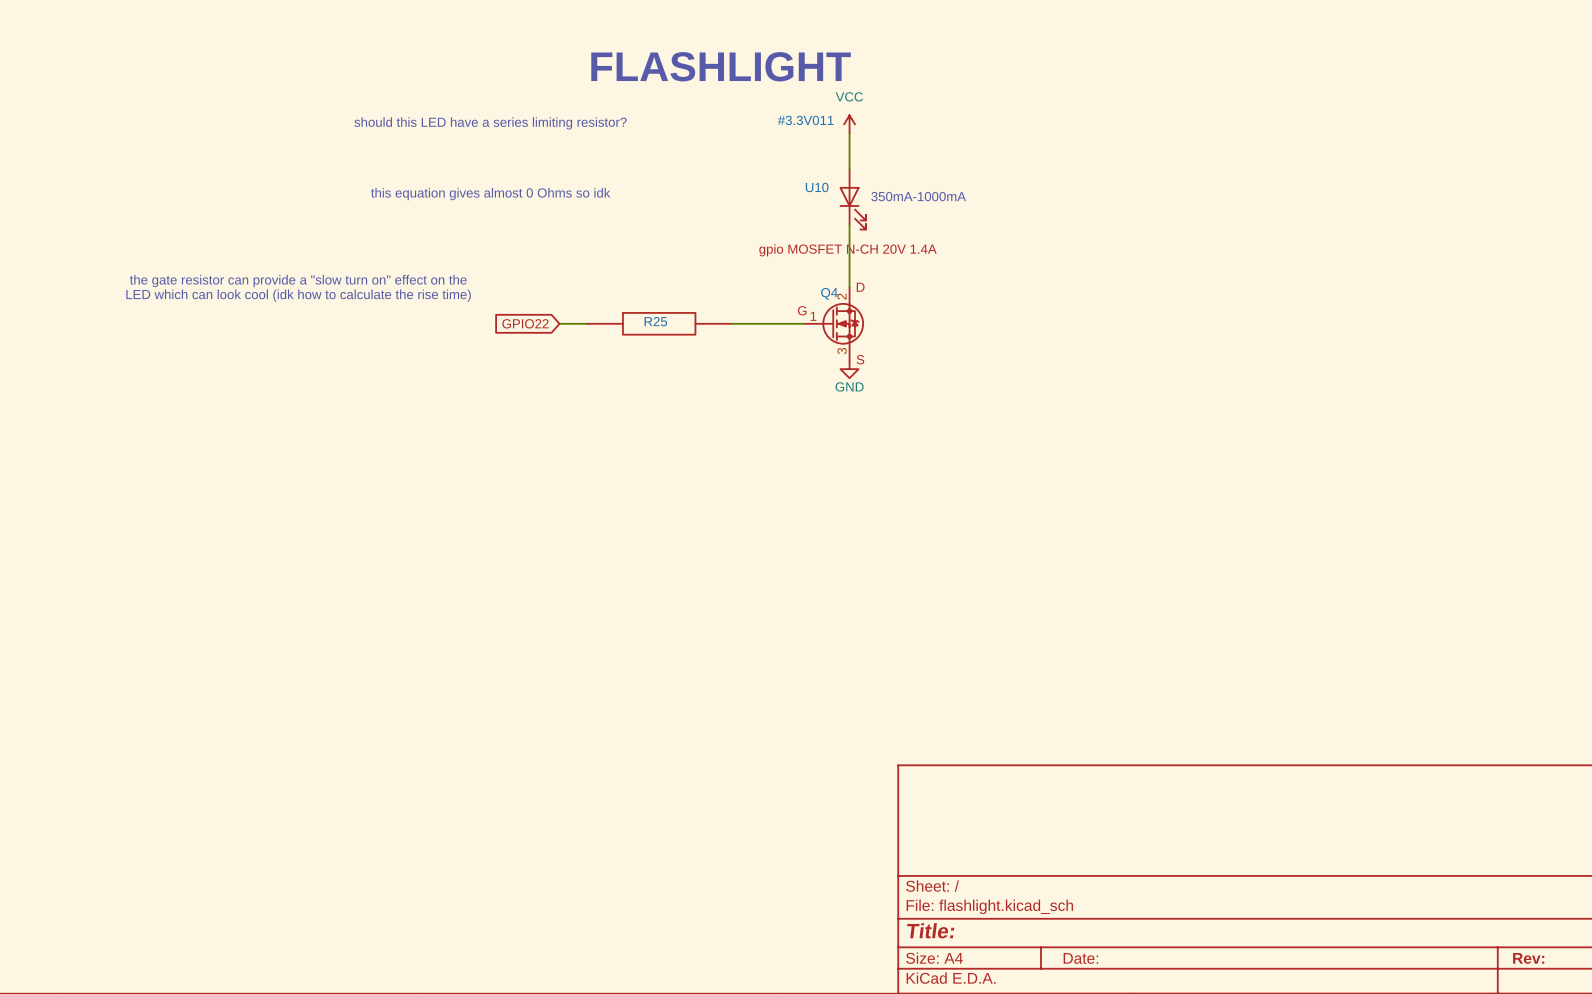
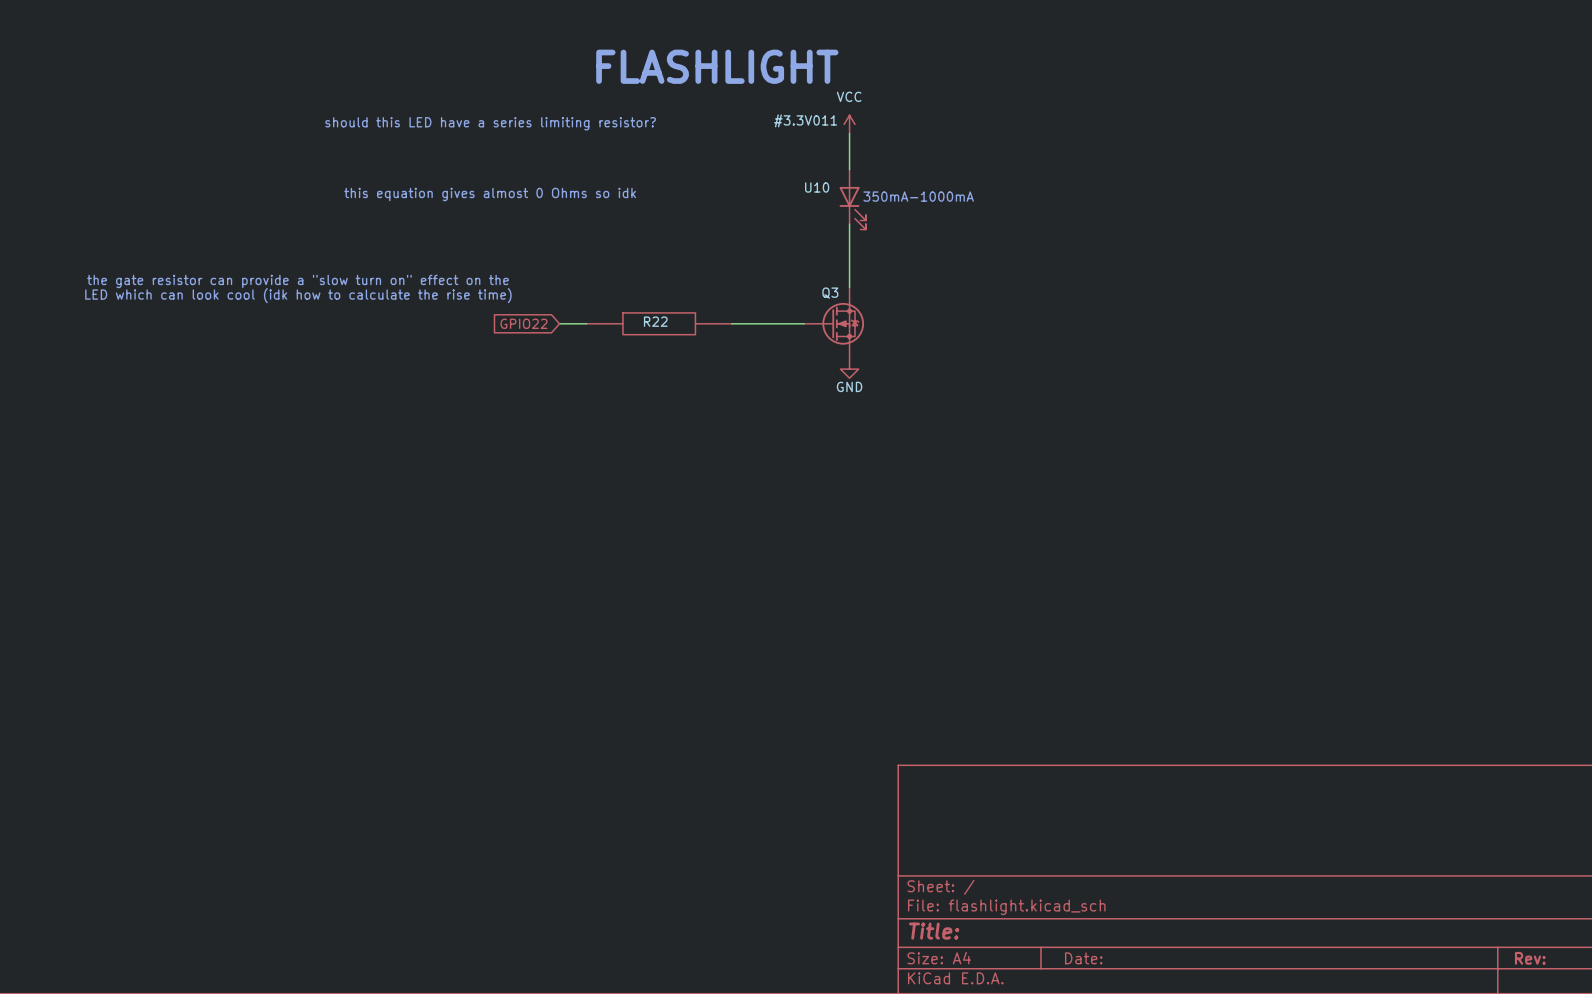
Q4 text: gpio MOSFET N-CH 20V 1.4A (848, 250) -> none
Q4 text: D (860, 287) -> none
Q4 name: Q4 (829, 293) -> Q3 (830, 293)
Q4 pin number: 2 (842, 296) -> none
Q4 text: G (802, 310) -> none
Q4 pin number: 1 (813, 316) -> none
R25 name: R25 (655, 321) -> R22 (655, 321)
Q4 pin number: 3 (842, 351) -> none
Q4 text: S (860, 359) -> none

